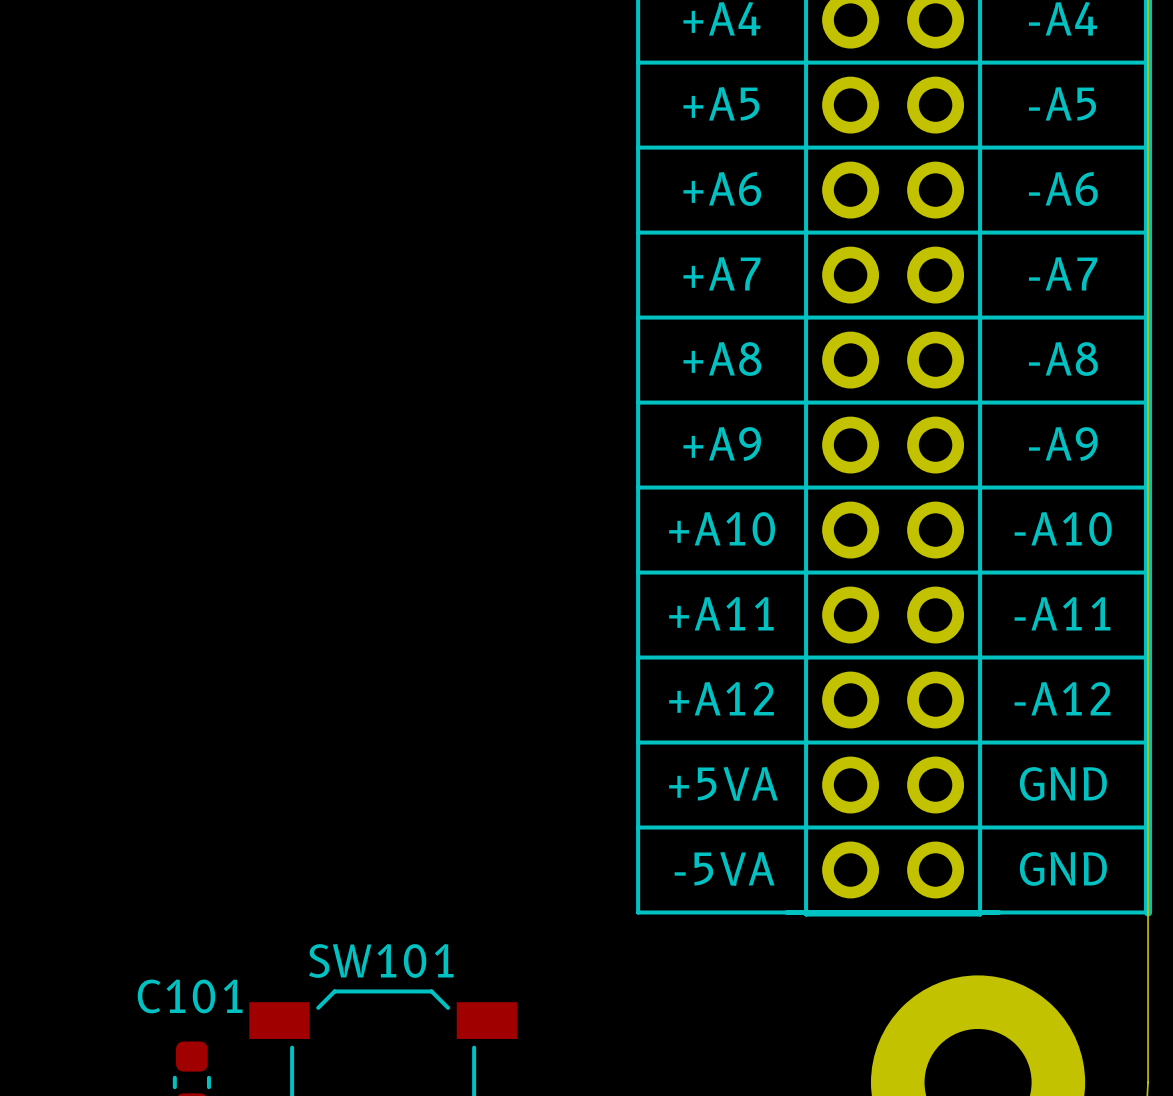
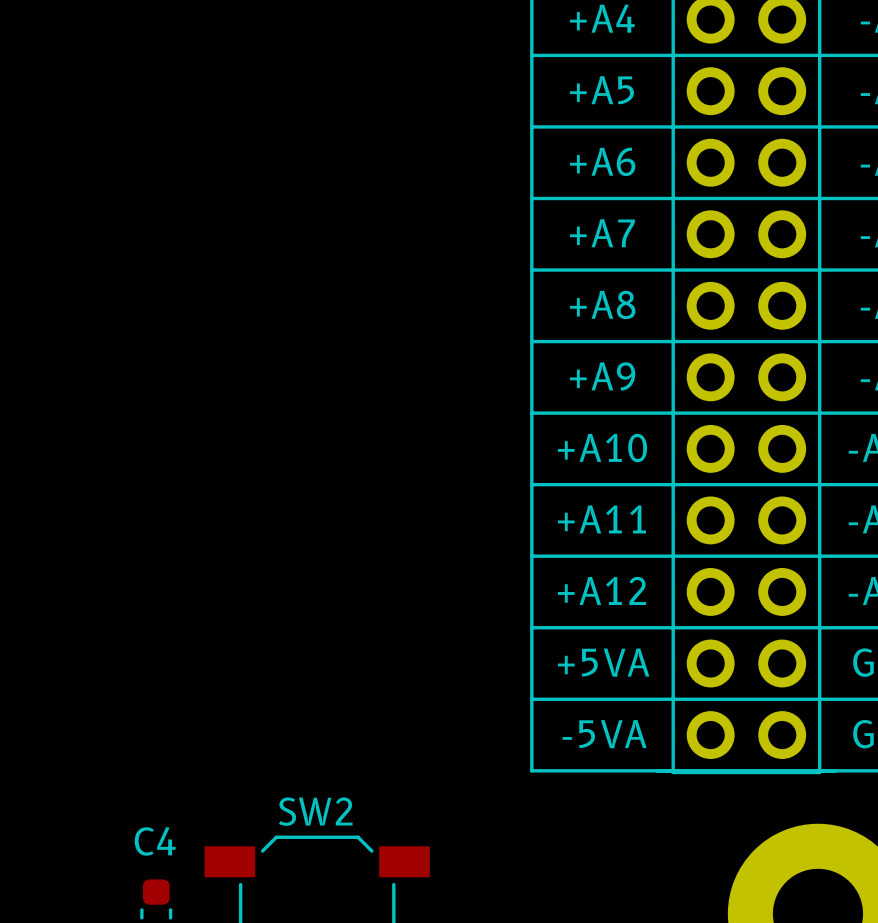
SW101 name: SW101 (381, 960) -> SW2 (315, 811)
C101 name: C101 (190, 996) -> C4 (155, 841)

